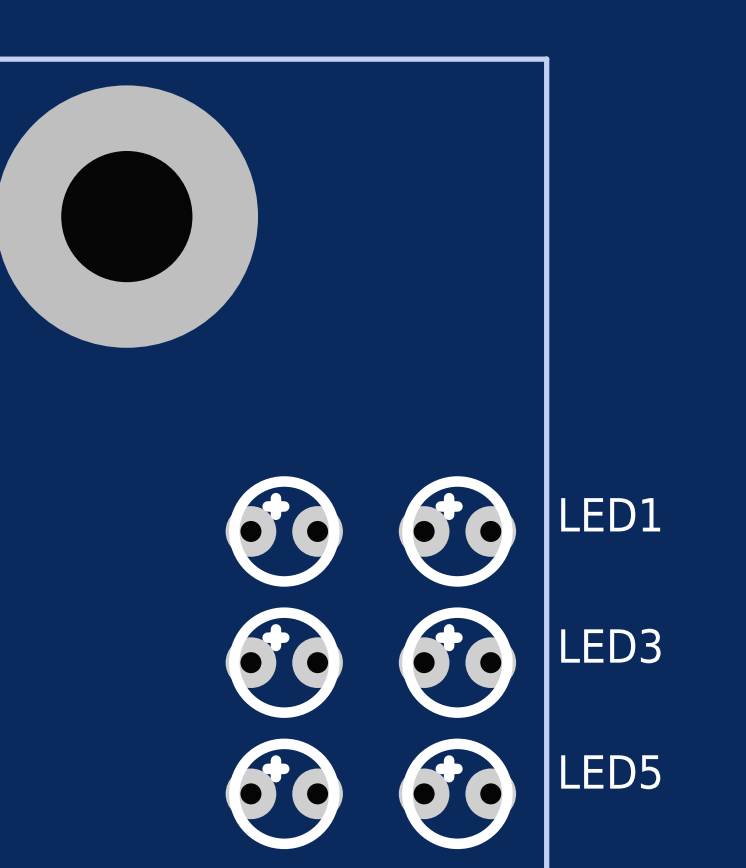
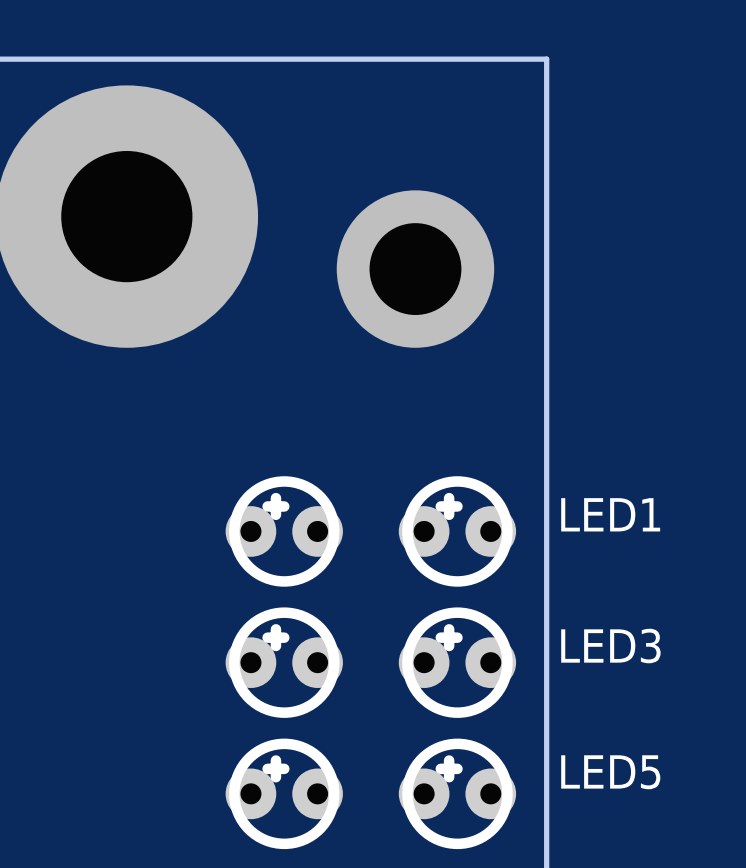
via: none -> (415, 269)

